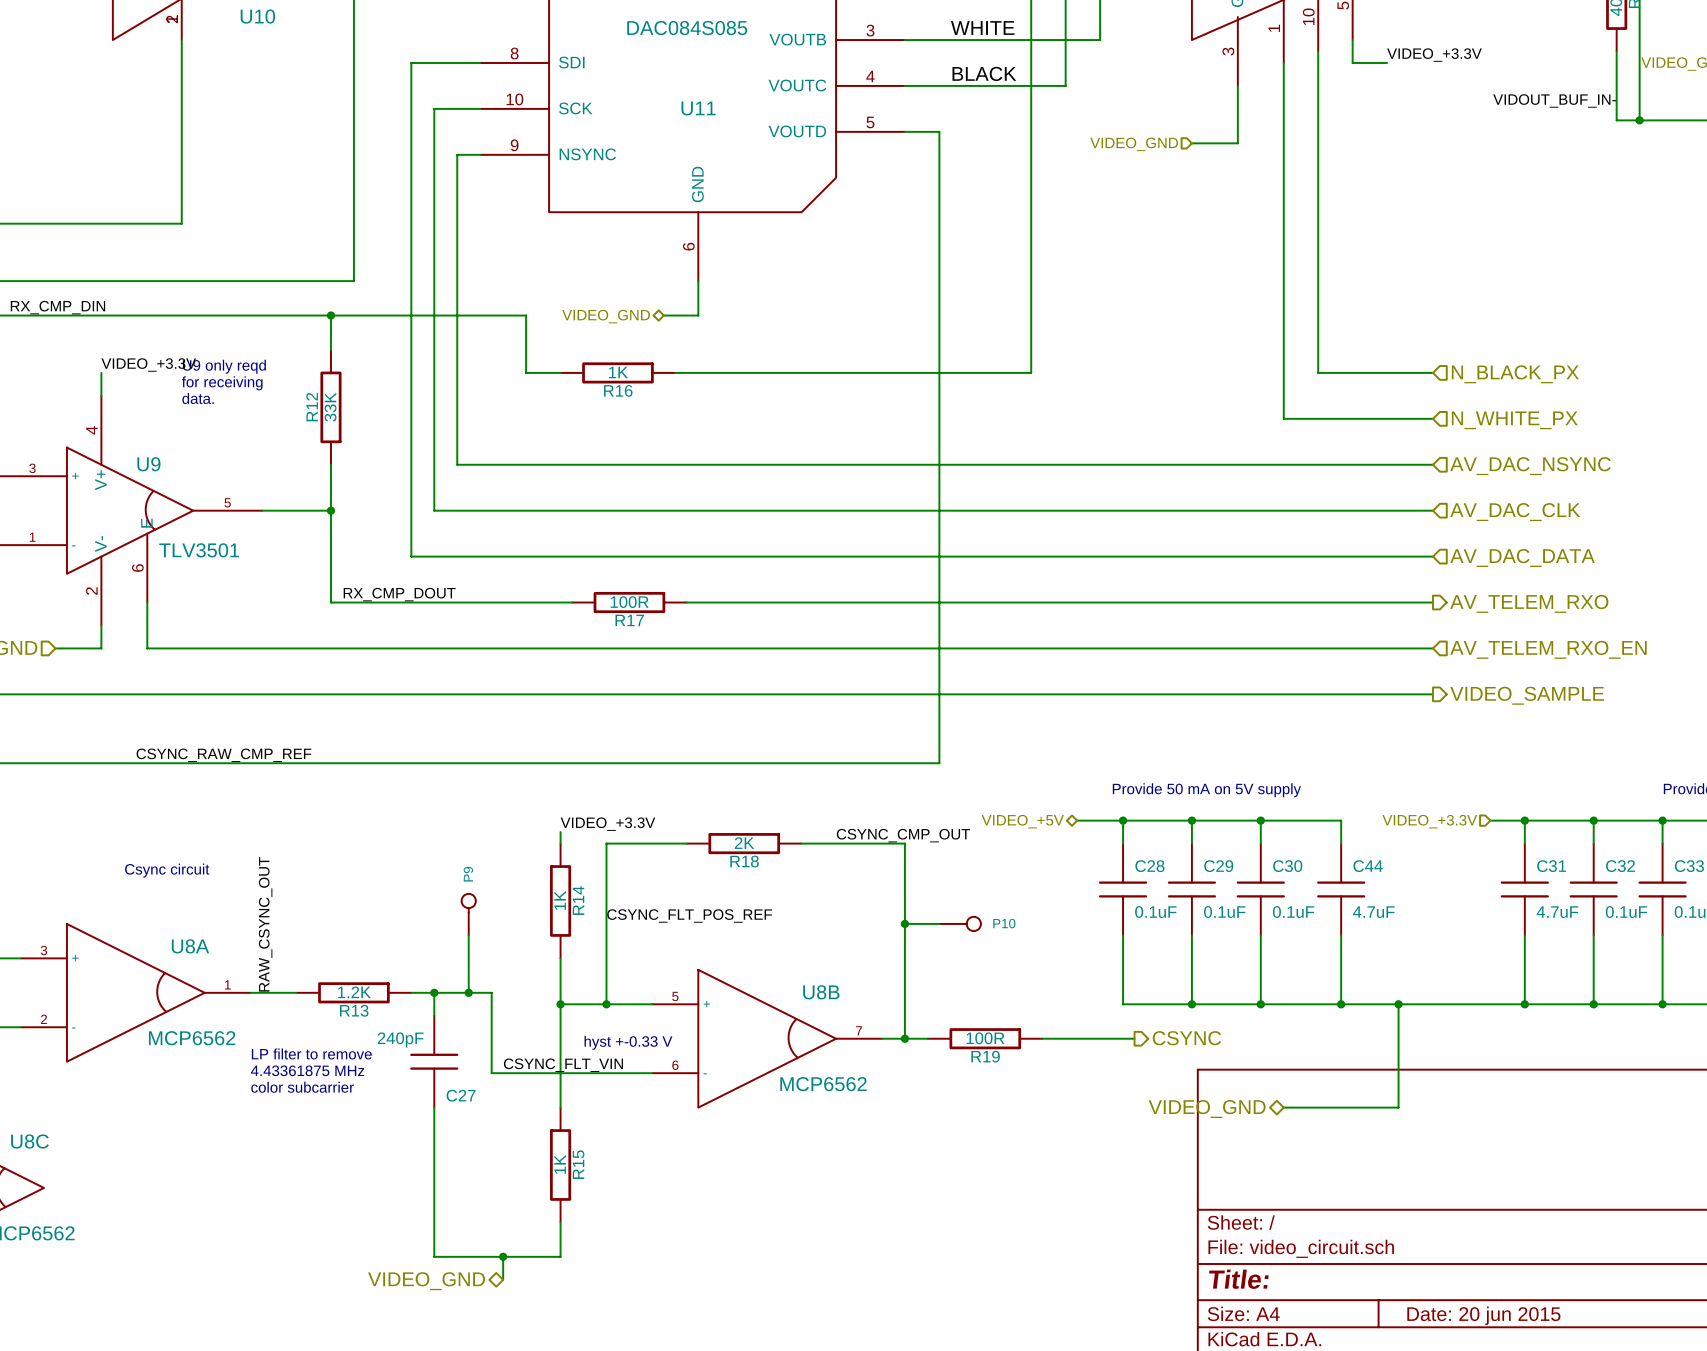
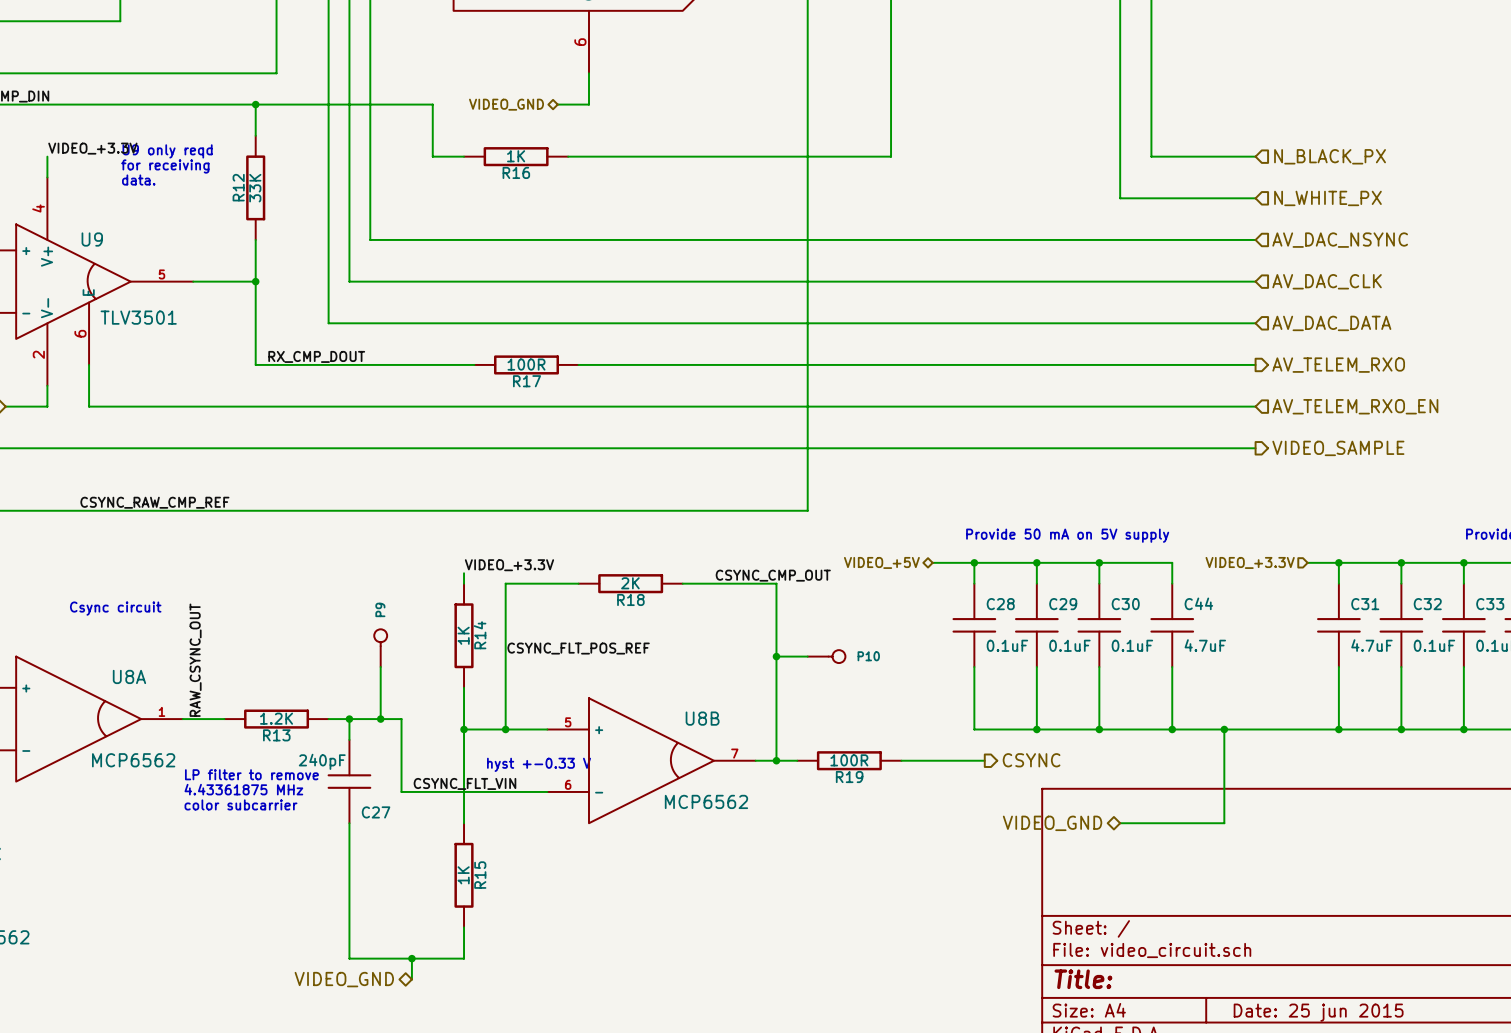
title block: Date: 20 jun 2015 (1483, 1315) -> Date: 25 jun 2015 (1318, 1012)

